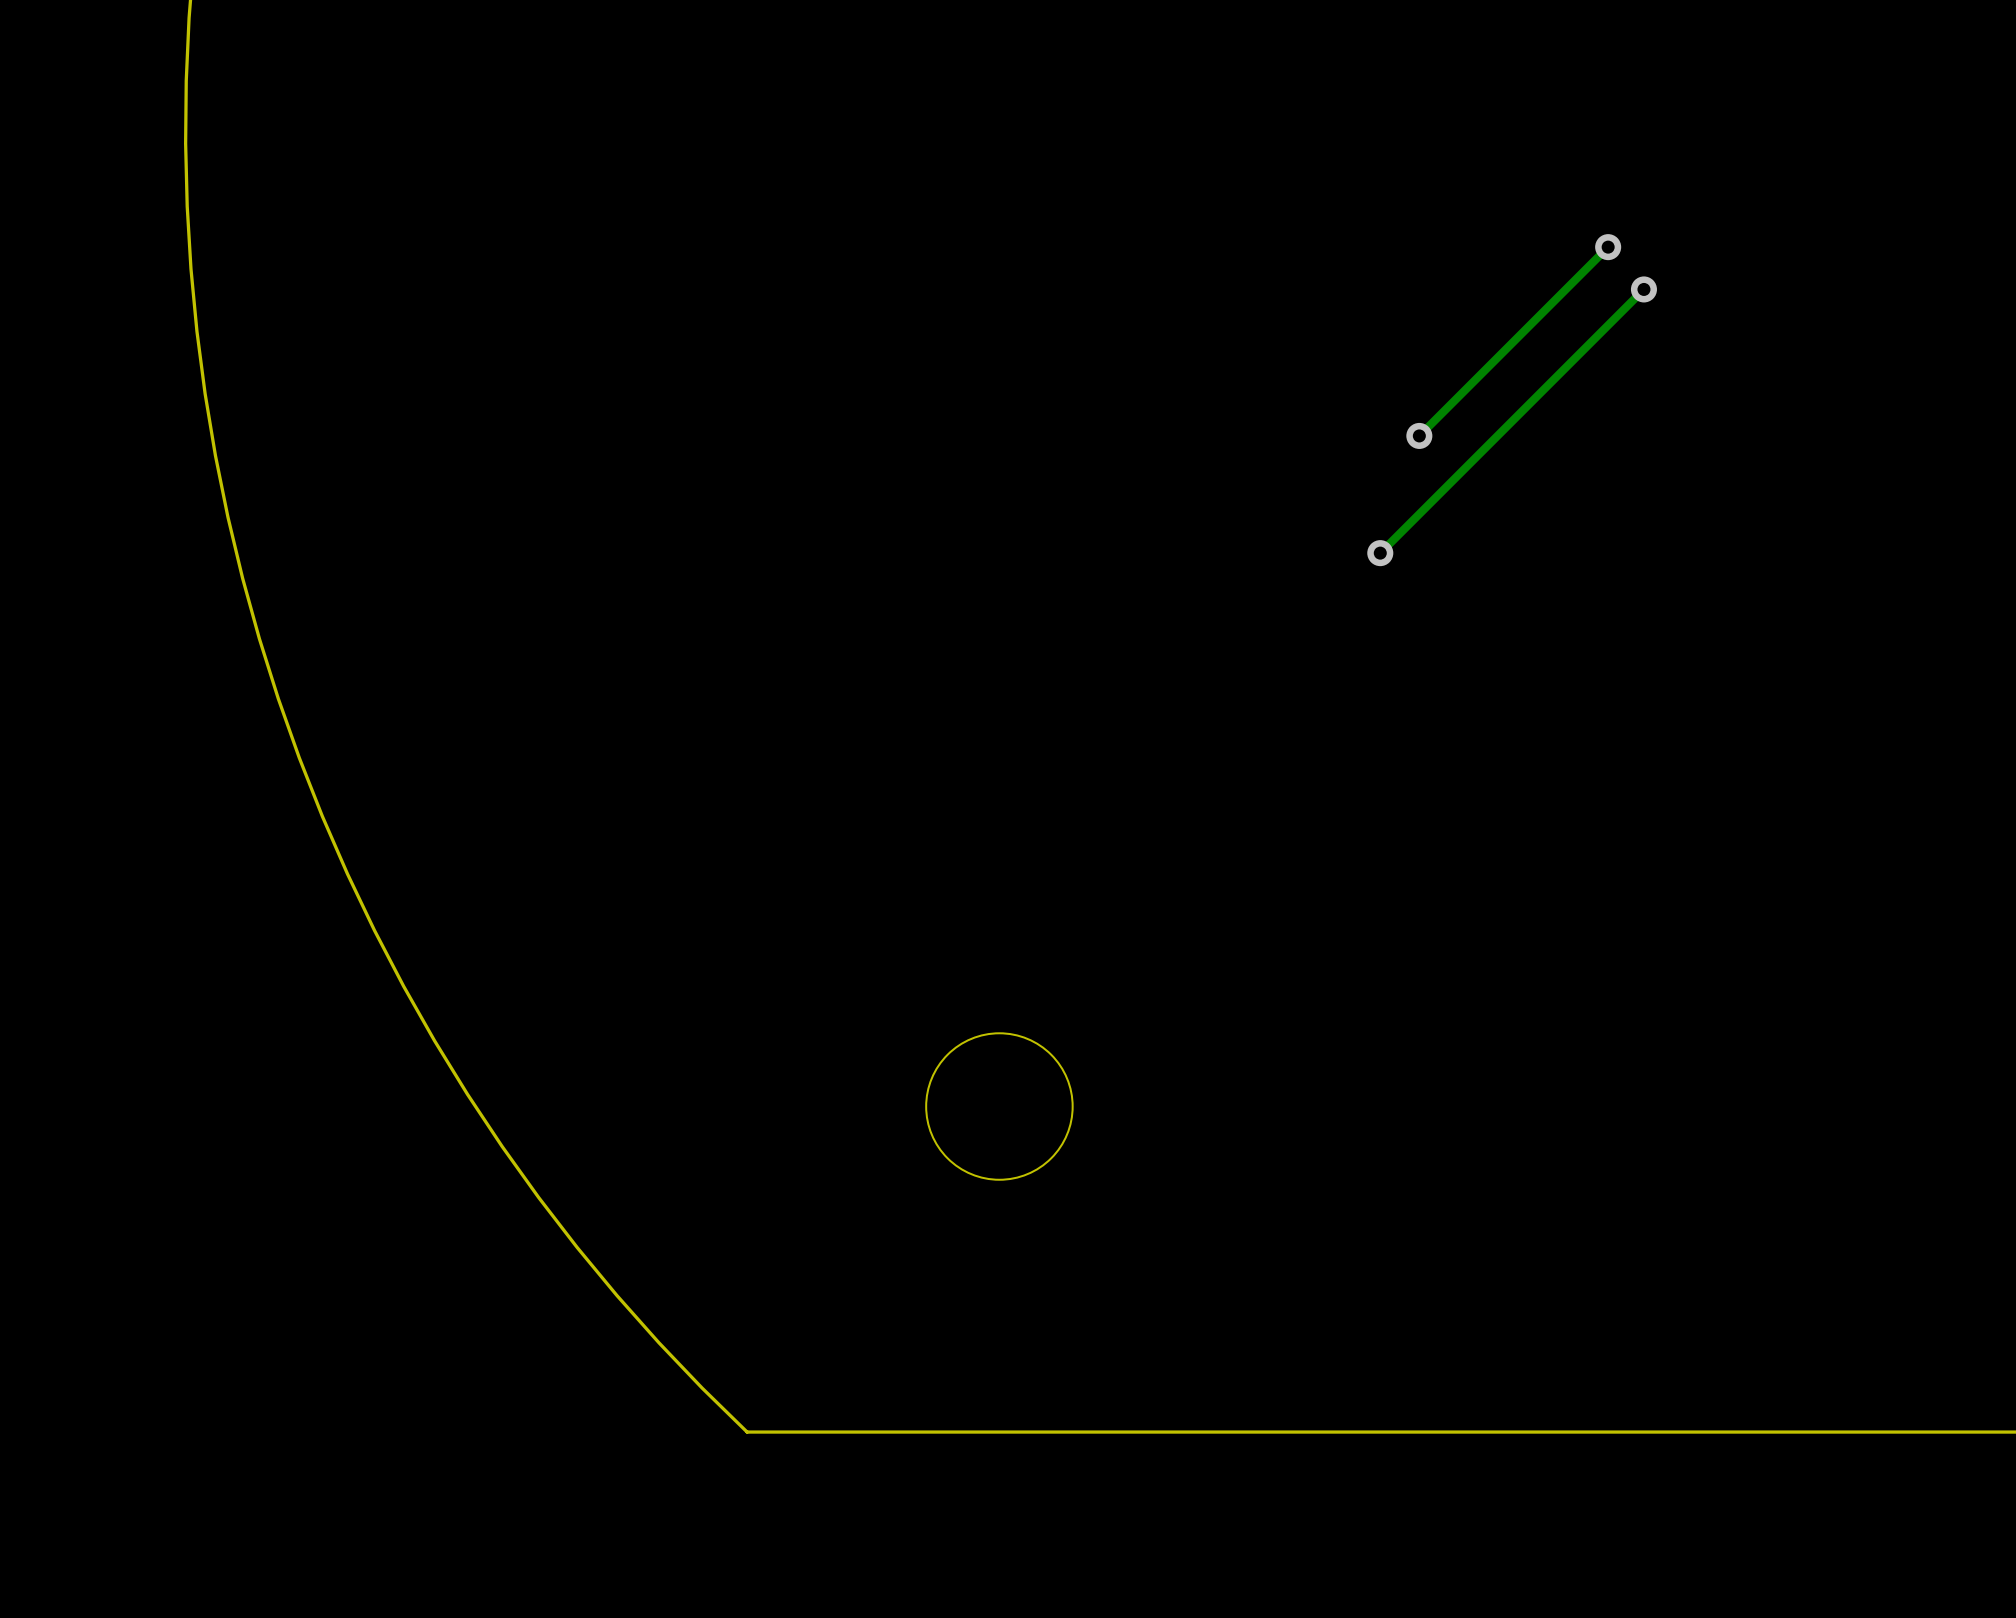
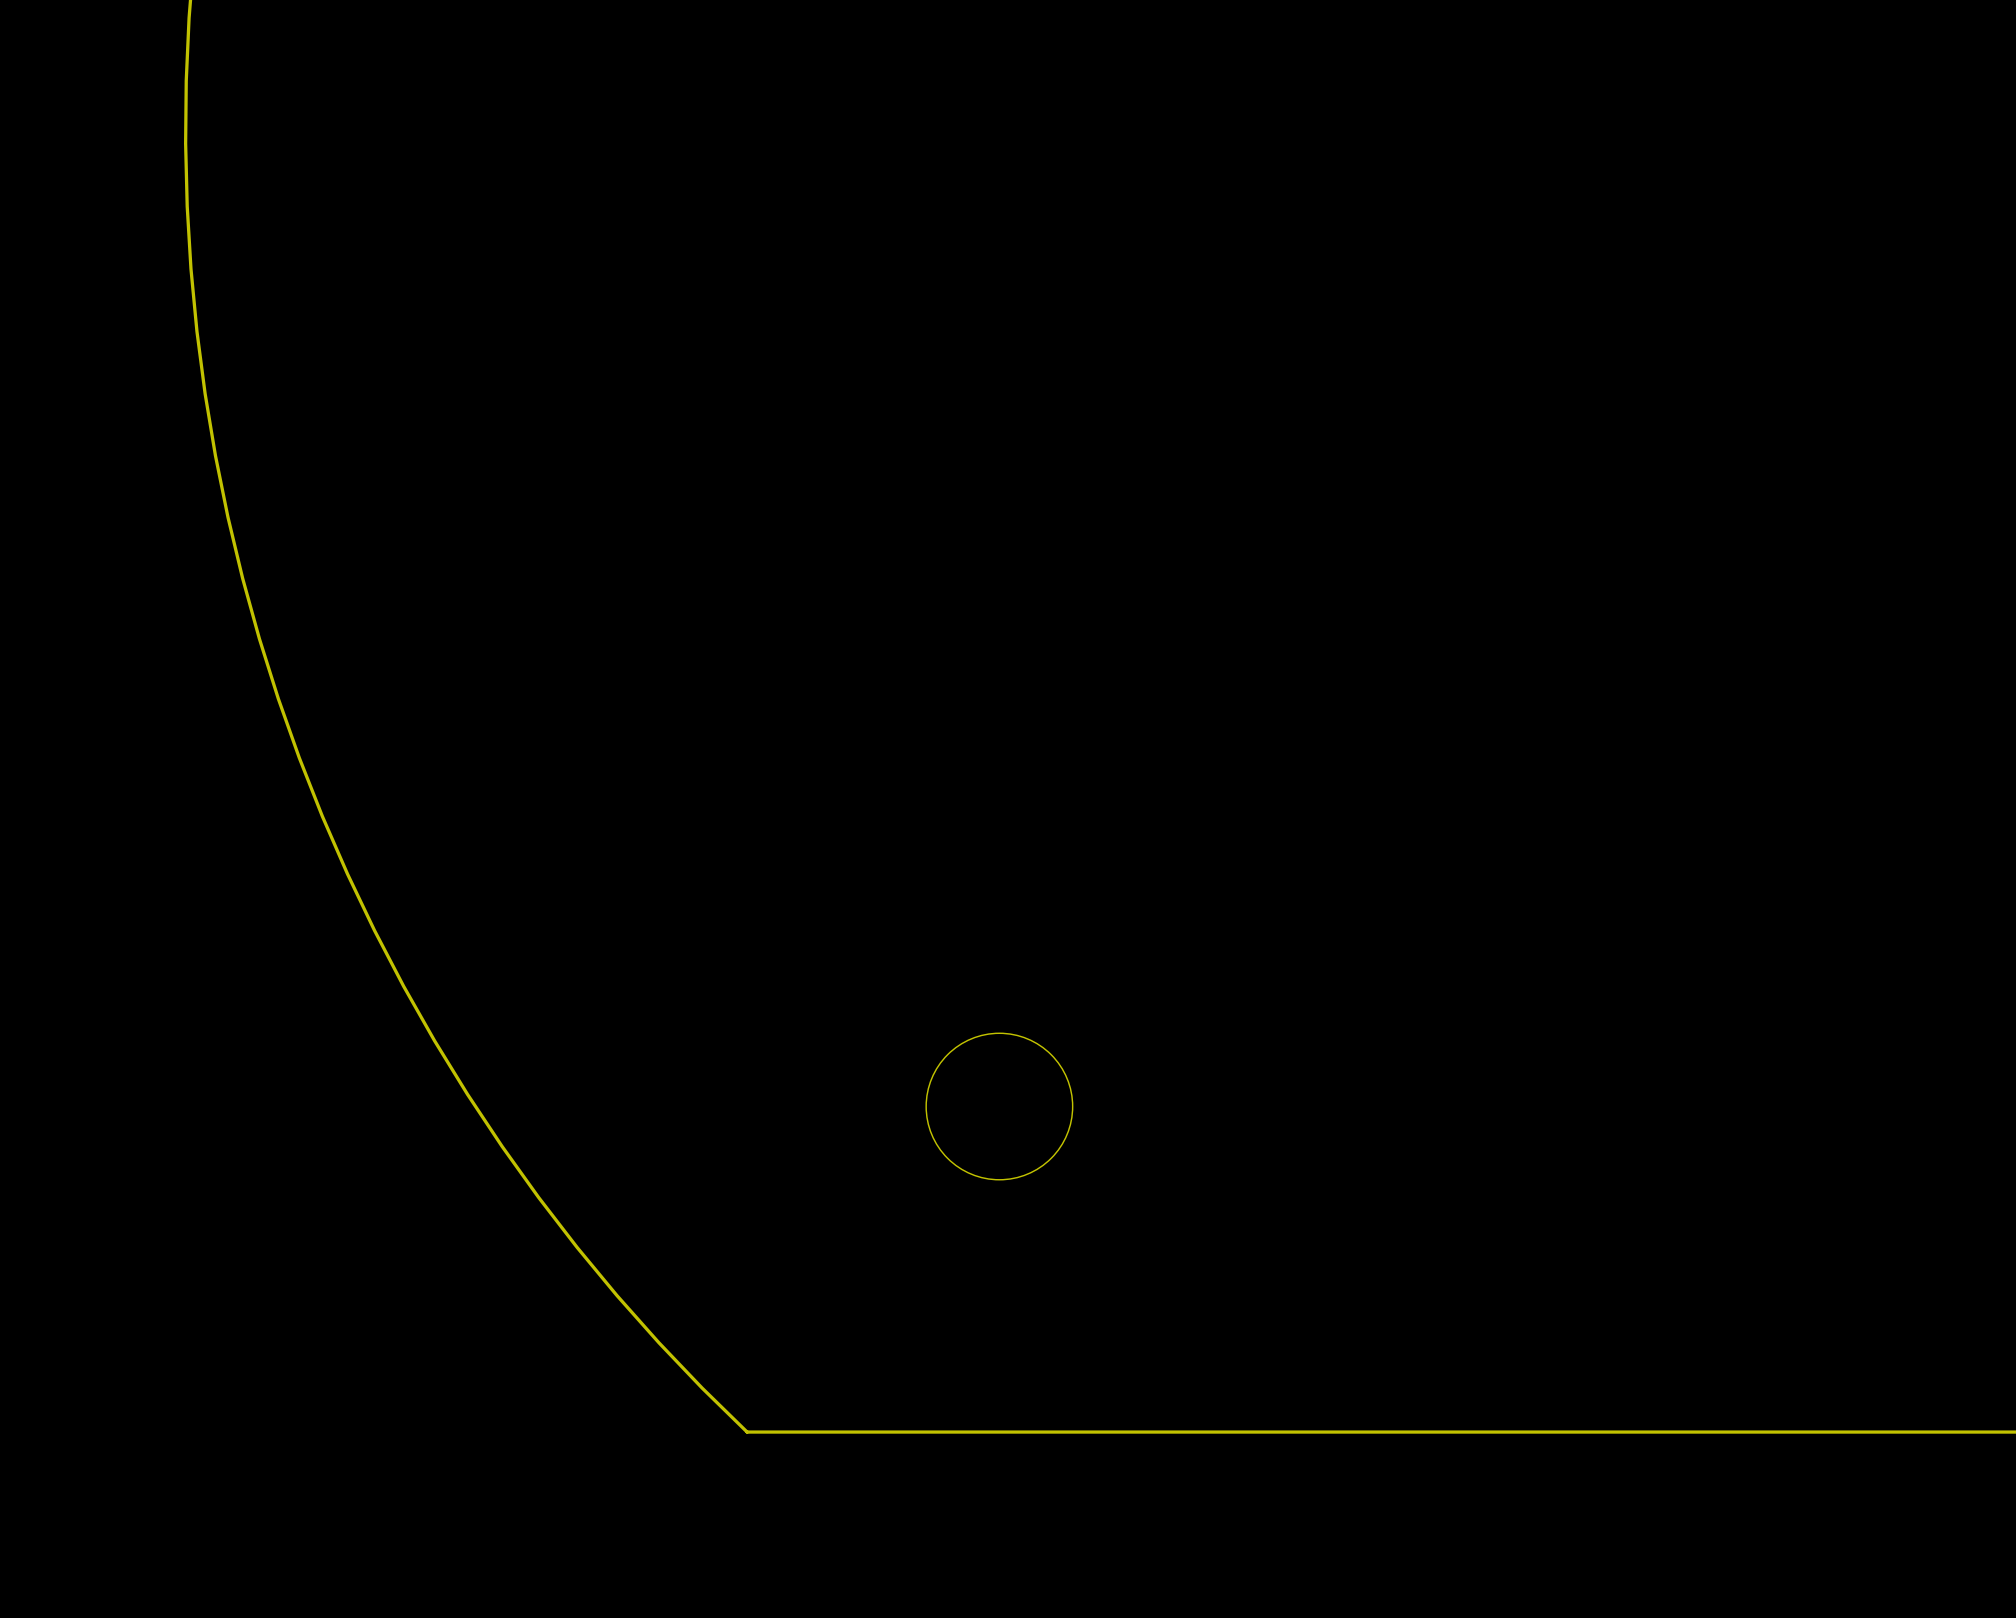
track: (1608, 247) (1419, 435) -> none
via: (1608, 247) -> none
track: (1643, 289) (1380, 553) -> none
via: (1643, 289) -> none
via: (1419, 435) -> none
via: (1380, 553) -> none

